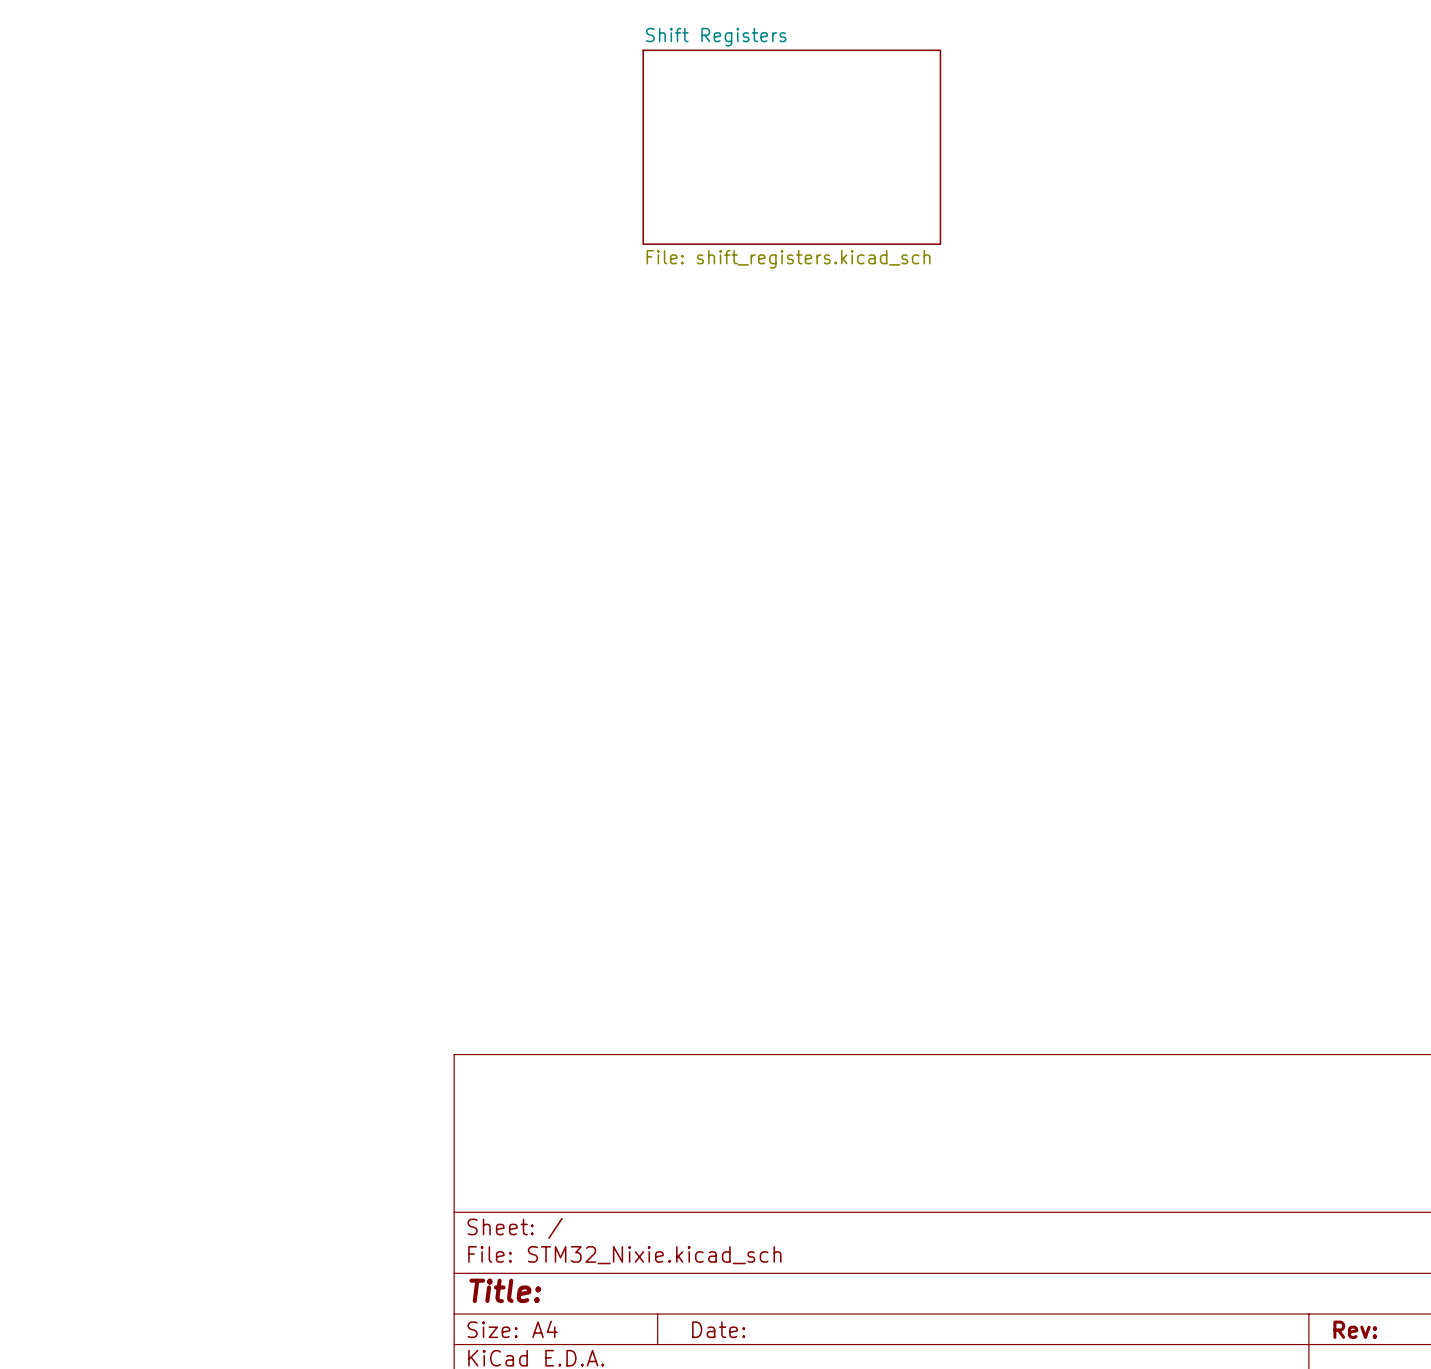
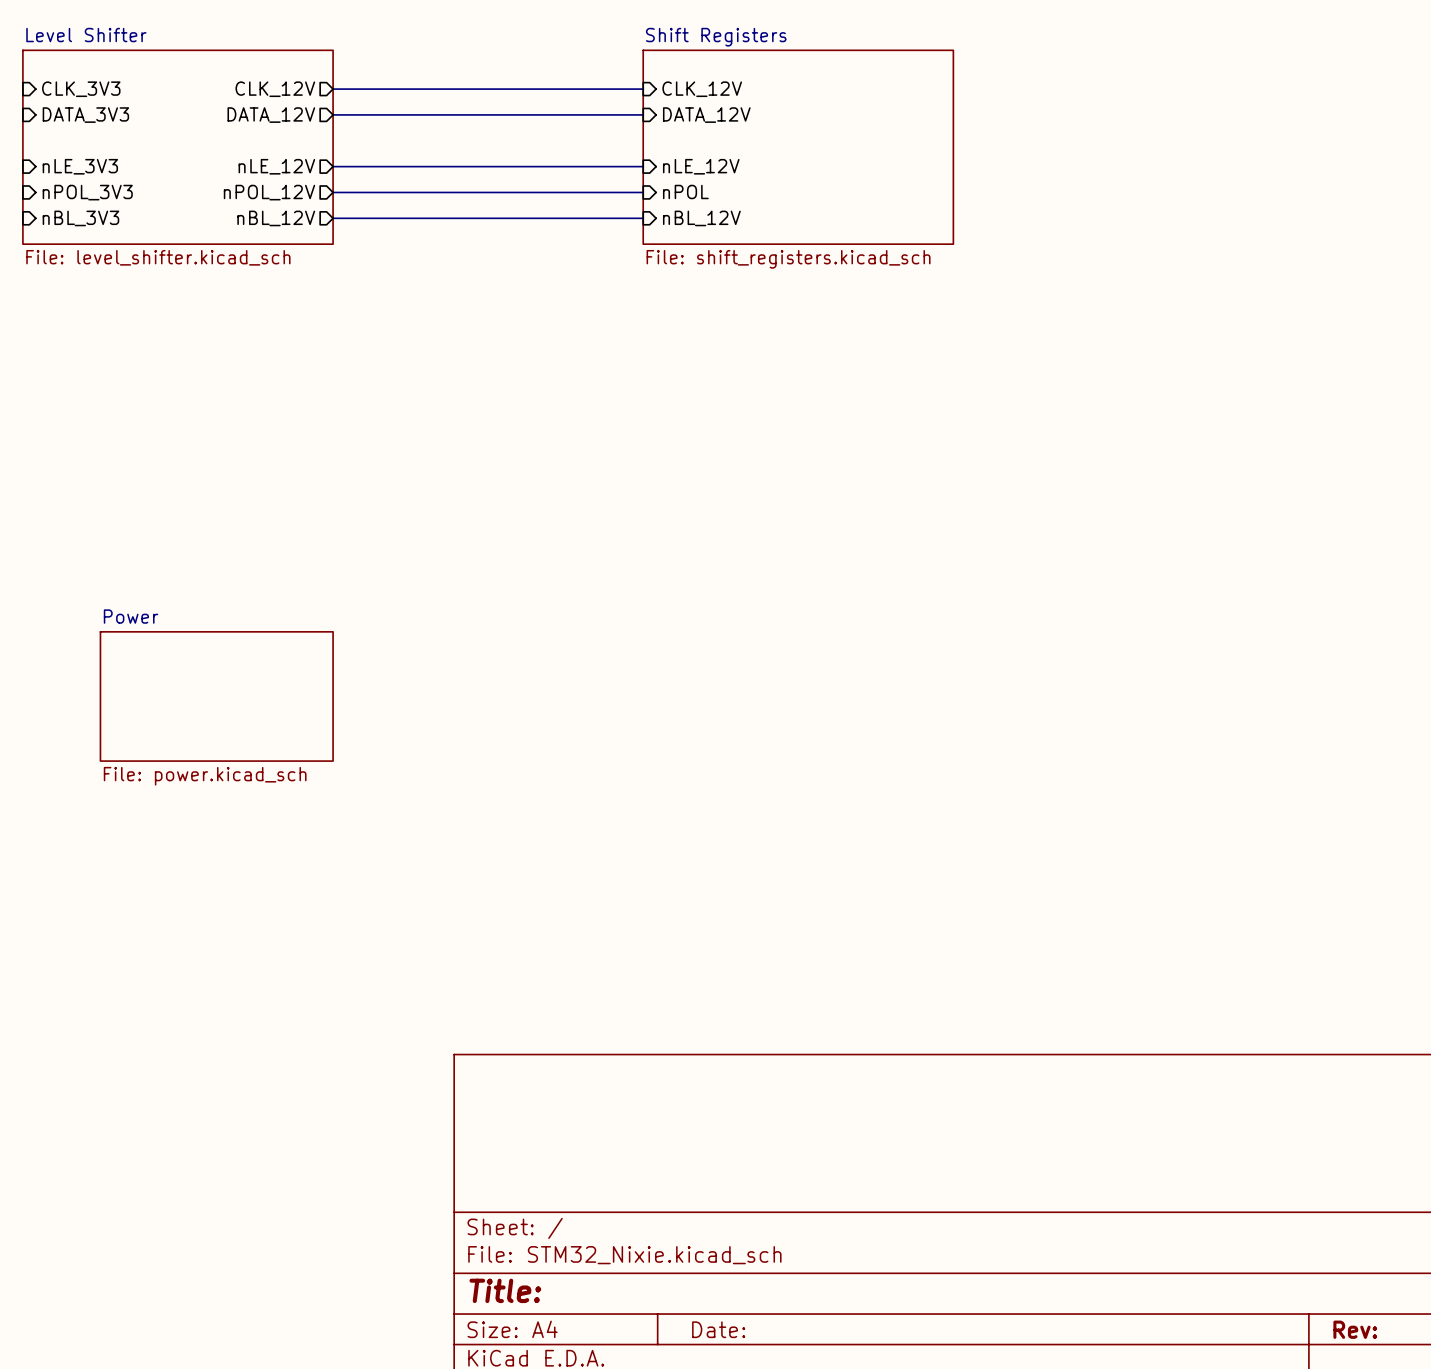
sheet Shift Registers shape: [642, 49, 942, 245] -> [642, 49, 955, 245]
sheet pin: none -> CLK_3V3 (81, 89)
sheet pin: none -> CLK_12V (275, 89)
wire: none -> (333, 89) (643, 89)
sheet pin: none -> CLK_12V (702, 89)
wire: none -> (333, 114) (643, 114)
sheet pin: none -> DATA_3V3 (85, 115)
sheet pin: none -> DATA_12V (271, 115)
sheet pin: none -> DATA_12V (706, 115)
sheet Level Shifter: none -> File: level_shifter.kicad_sch (177, 147)
sheet pin: none -> nLE_3V3 (80, 166)
sheet pin: none -> nLE_12V (276, 166)
wire: none -> (333, 166) (643, 166)
sheet pin: none -> nLE_12V (701, 166)
sheet pin: none -> nPOL (685, 191)
sheet pin: none -> nPOL_3V3 (87, 192)
sheet pin: none -> nPOL_12V (269, 192)
wire: none -> (333, 192) (643, 192)
sheet pin: none -> nBL_3V3 (80, 218)
sheet pin: none -> nBL_12V (276, 218)
wire: none -> (333, 218) (643, 218)
sheet pin: none -> nBL_12V (701, 218)
sheet Power: none -> File: power.kicad_sch (216, 696)

